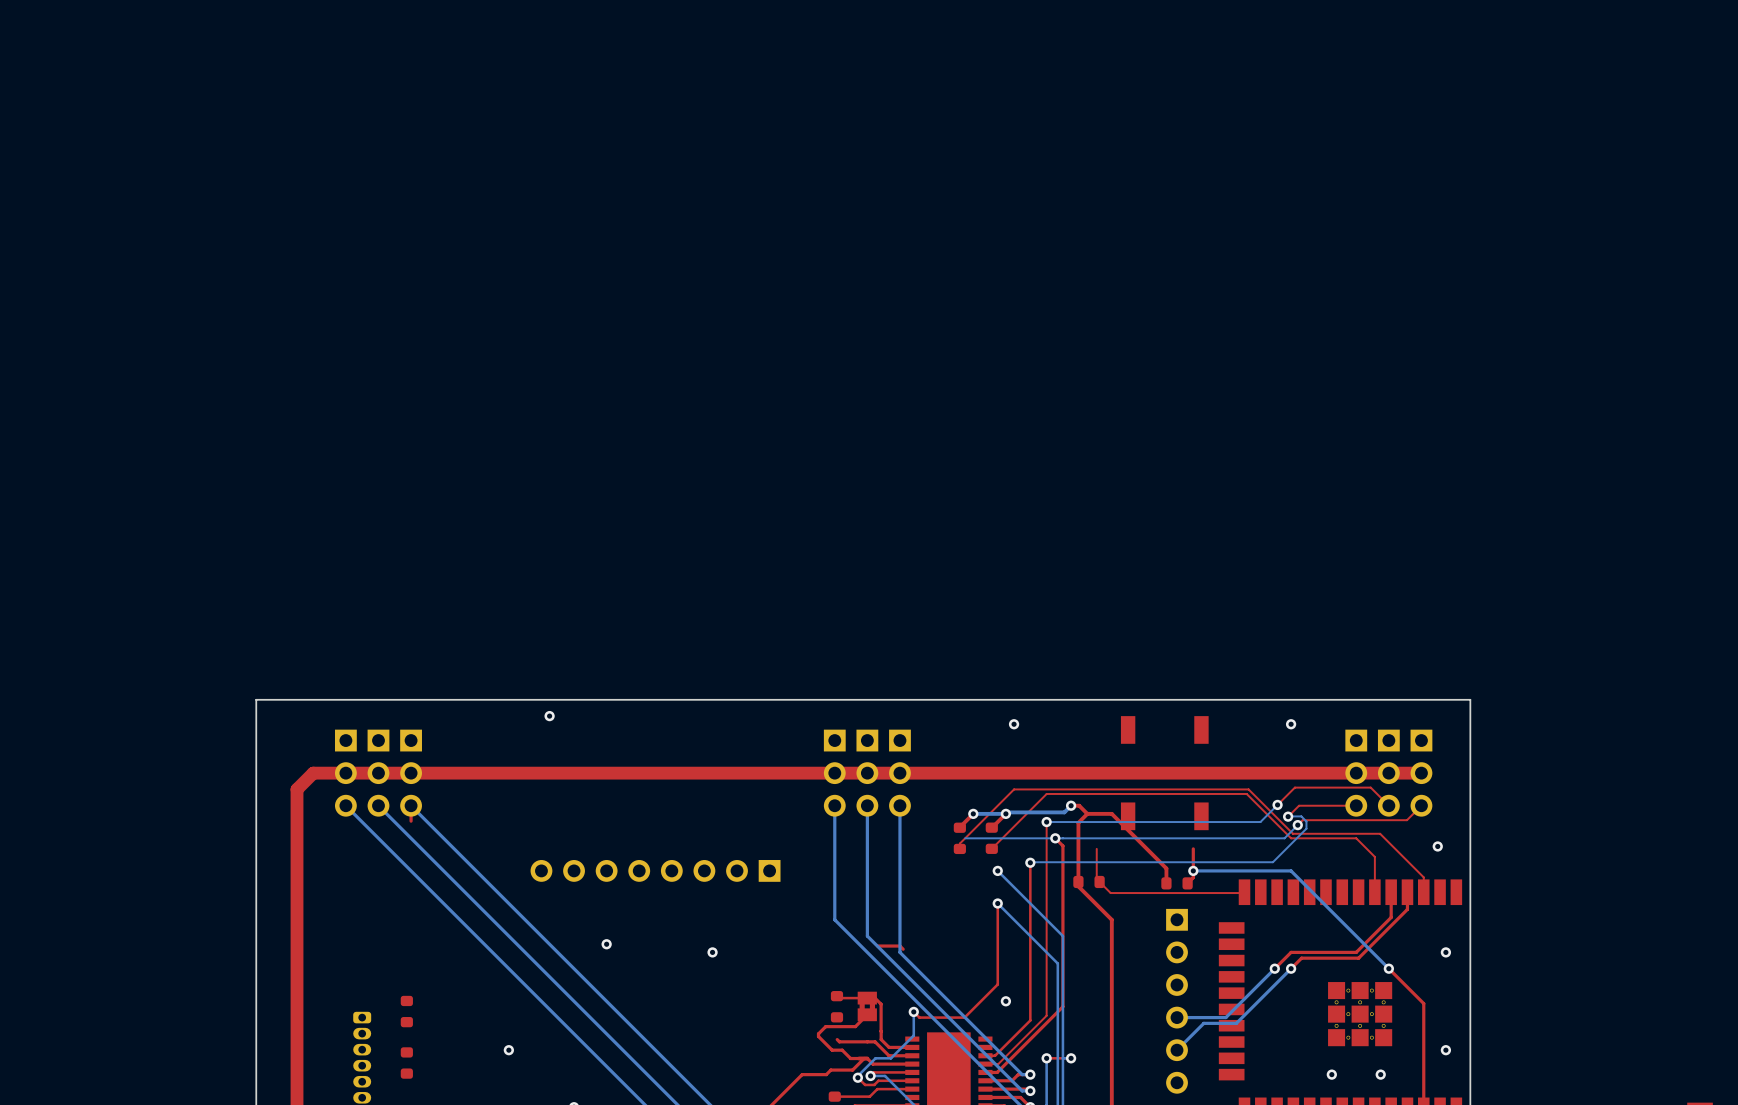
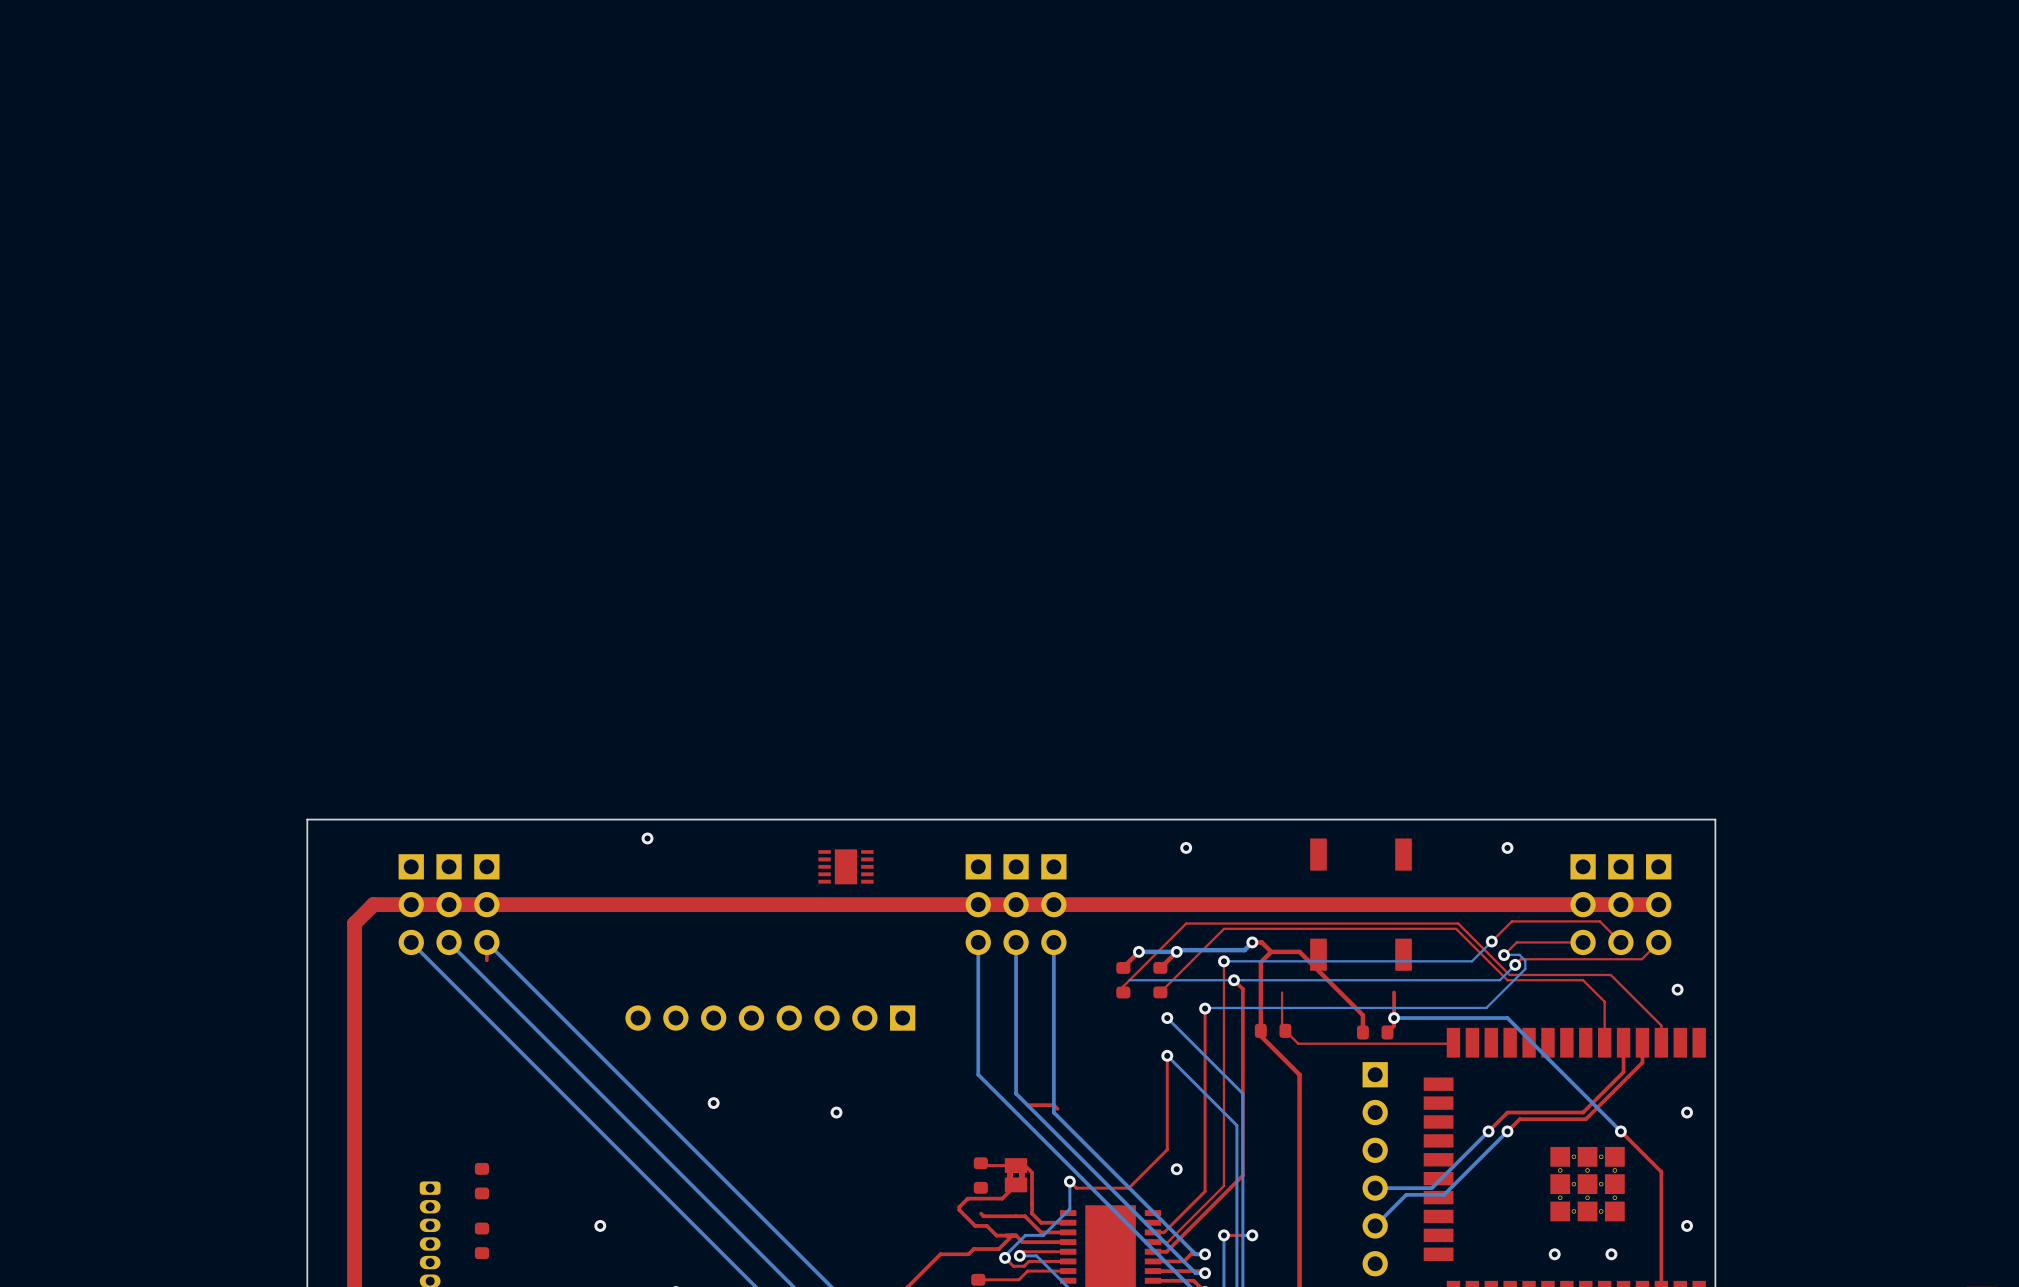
part: none -> (845, 866)

